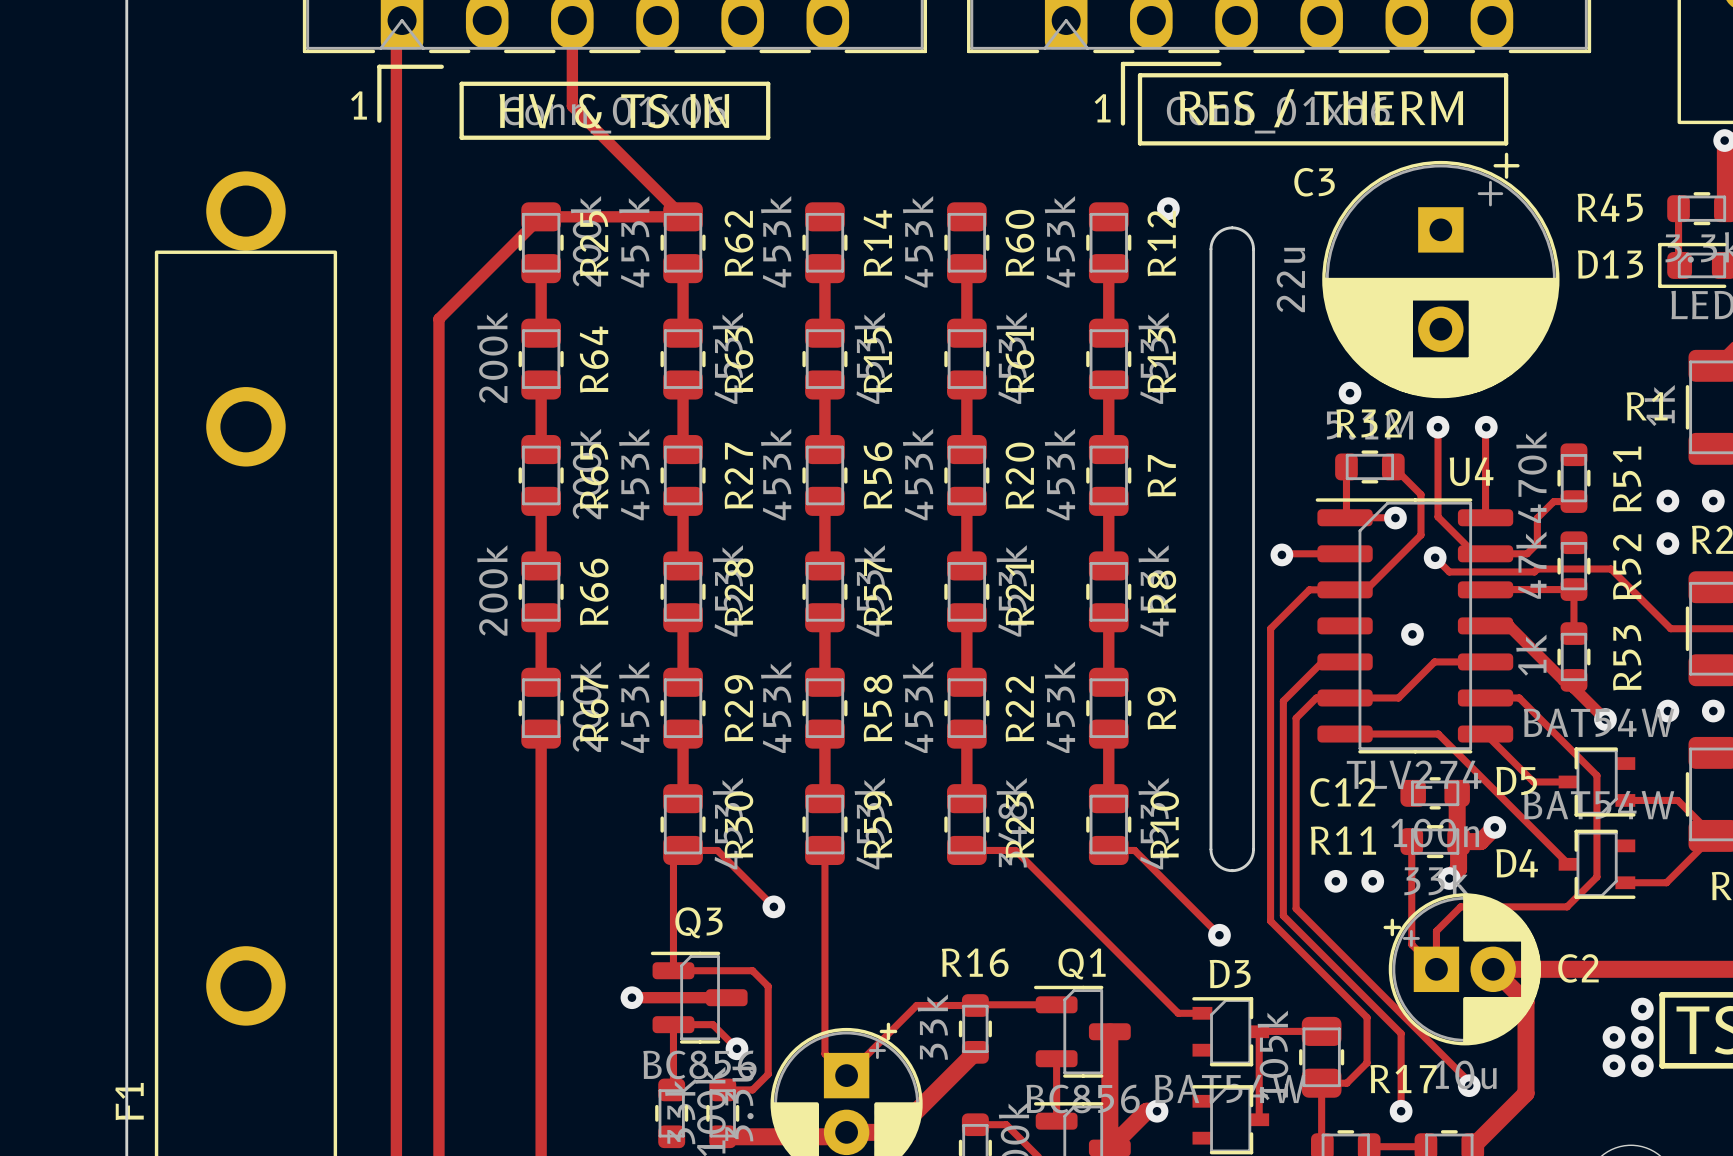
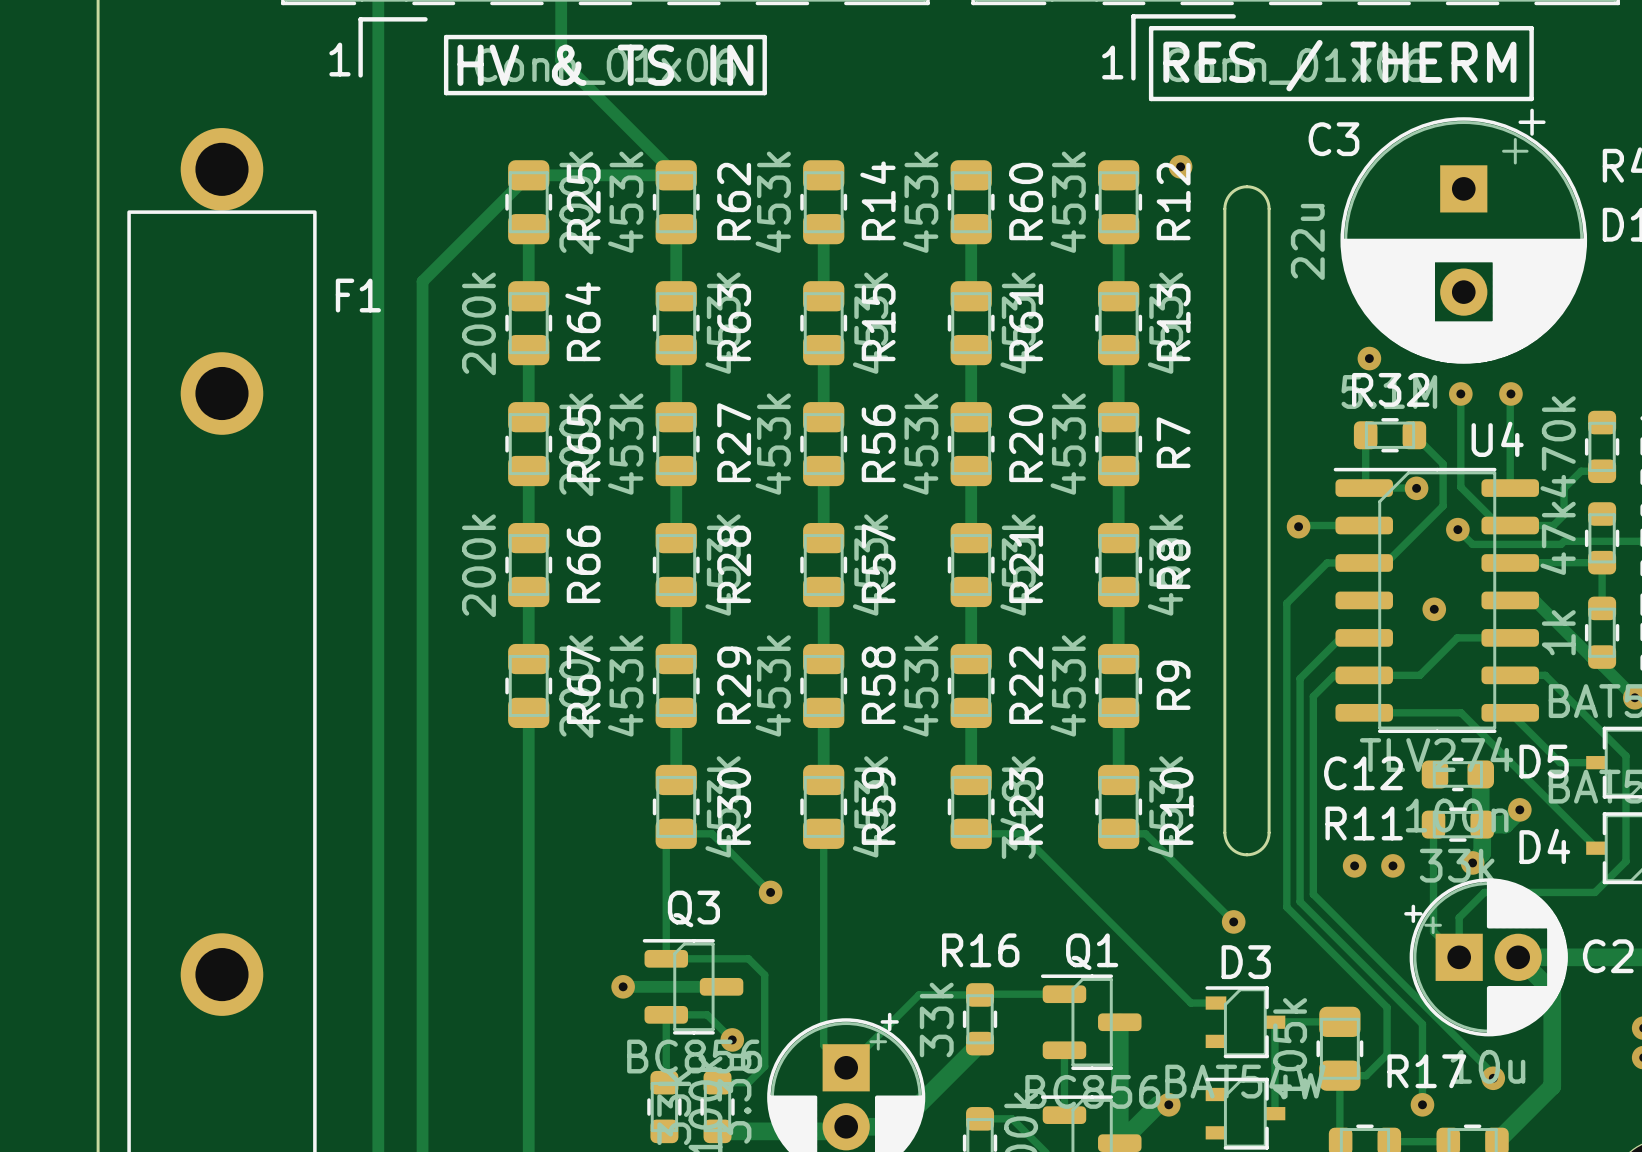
F1 name rotation: 0° (129, 1101) -> 90° clockwise (358, 295)
F1 name position: F1 (129, 1101) -> F1 (358, 295)

